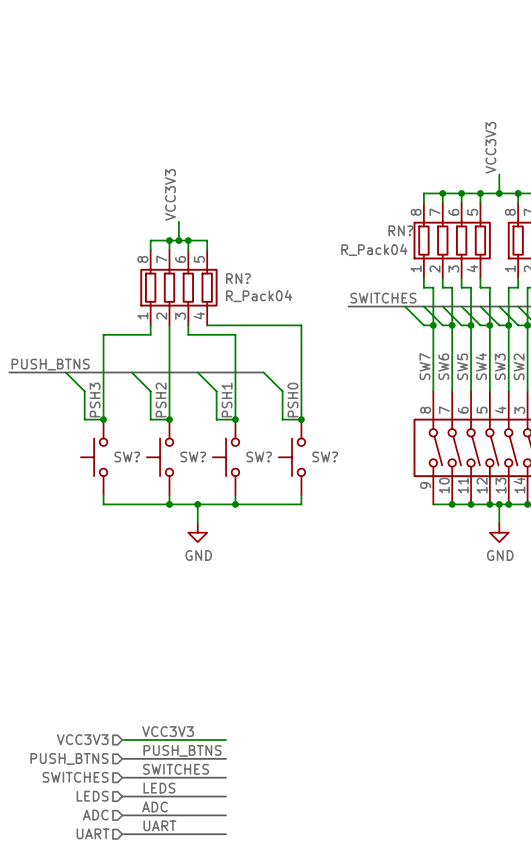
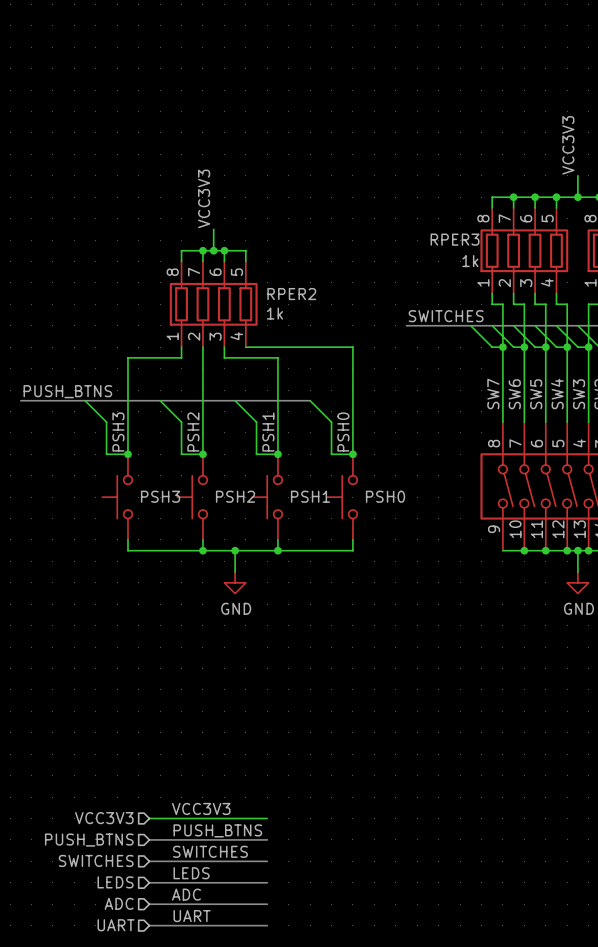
RN? name: RN? (400, 230) -> RPER3 (455, 239)
RN? value: R_Pack04 (374, 249) -> 1k (470, 261)
RN? name: RN? (238, 278) -> RPER2 (291, 294)
RN? value: R_Pack04 (259, 296) -> 1k (274, 313)
SW? name: SW? (127, 456) -> PSH3 (160, 496)
SW? name: SW? (193, 456) -> PSH2 (235, 496)
SW? name: SW? (259, 456) -> PSH1 (310, 496)
SW? name: SW? (325, 456) -> PSH0 (385, 496)

